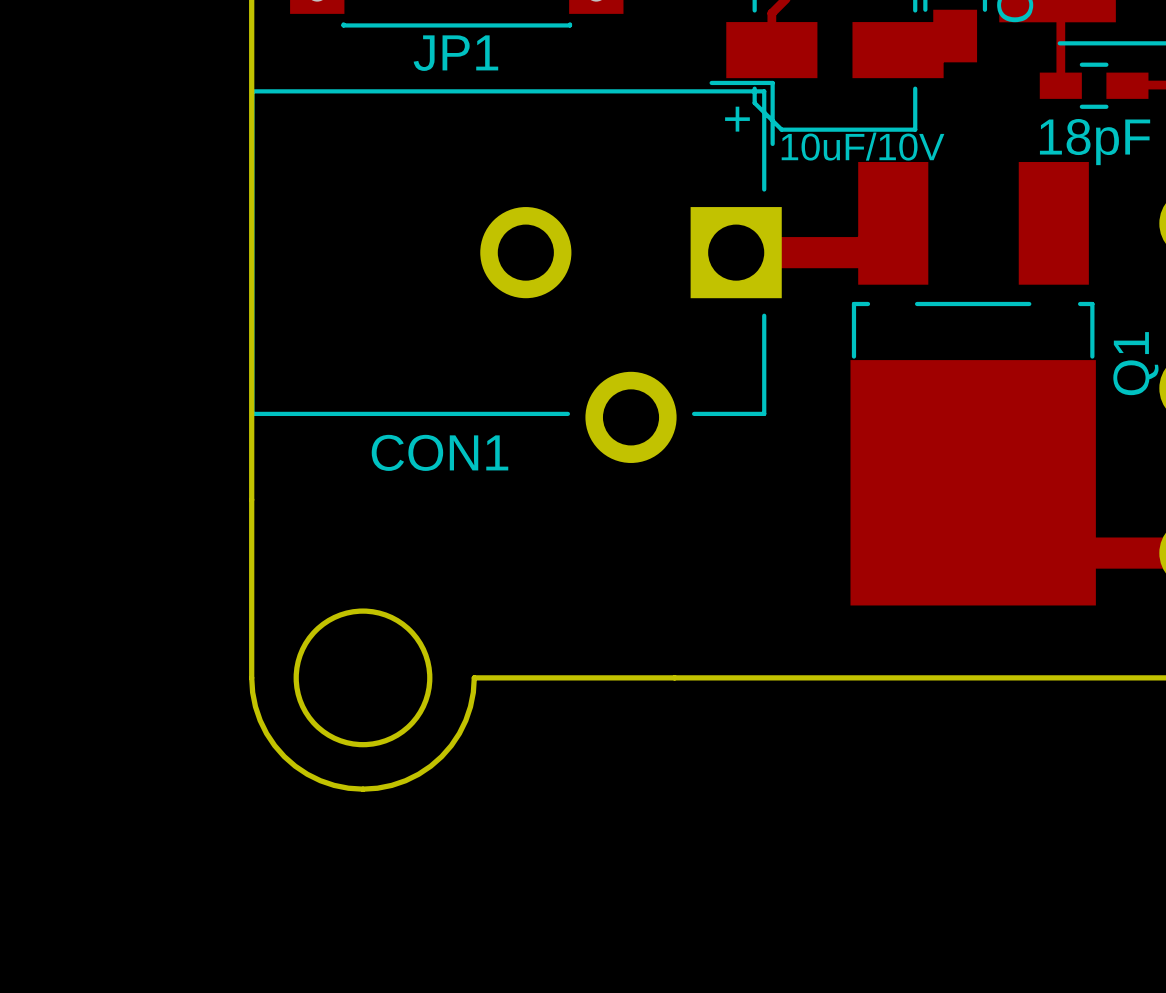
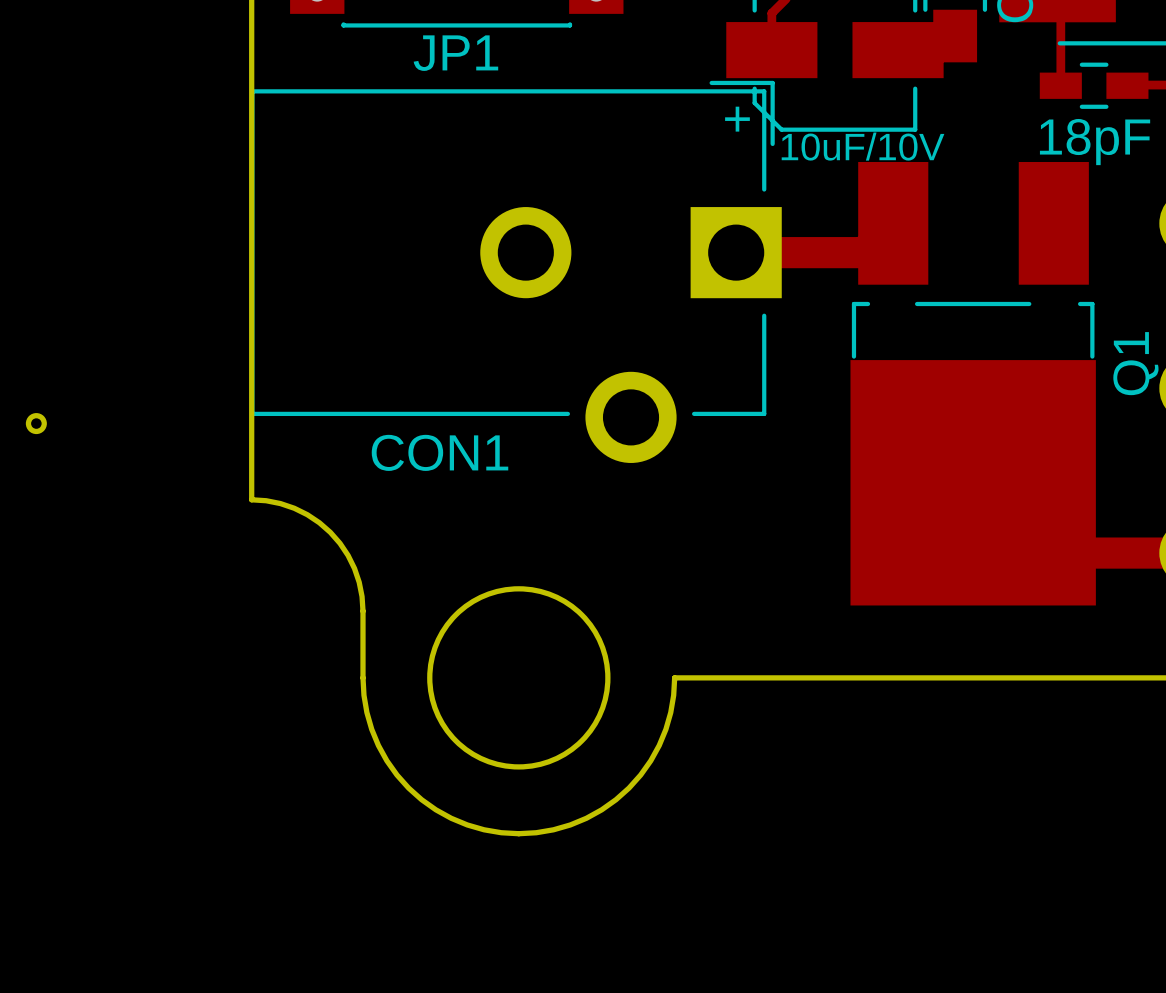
part: none -> (36, 423)
board edge: (251, 499) (251, 677) (255, 706) (260, 720) (266, 733) (284, 756) (307, 774) (334, 785) (363, 789) -> none
round board edge: none -> [427, 586, 611, 770]
round board edge: [293, 608, 433, 748] -> none
board edge: (674, 677) (474, 677) (470, 706) (465, 720) (451, 745) (441, 756) (418, 774) (405, 780) (377, 788) (363, 789) -> (674, 677) (673, 695) (665, 729) (650, 760) (629, 788) (601, 809) (570, 824) (536, 832) (518, 833) (484, 829) (451, 818) (421, 799) (396, 775) (386, 760) (371, 729) (363, 695) (362, 596) (354, 568) (348, 555) (330, 532) (307, 514) (280, 503) (251, 499)

